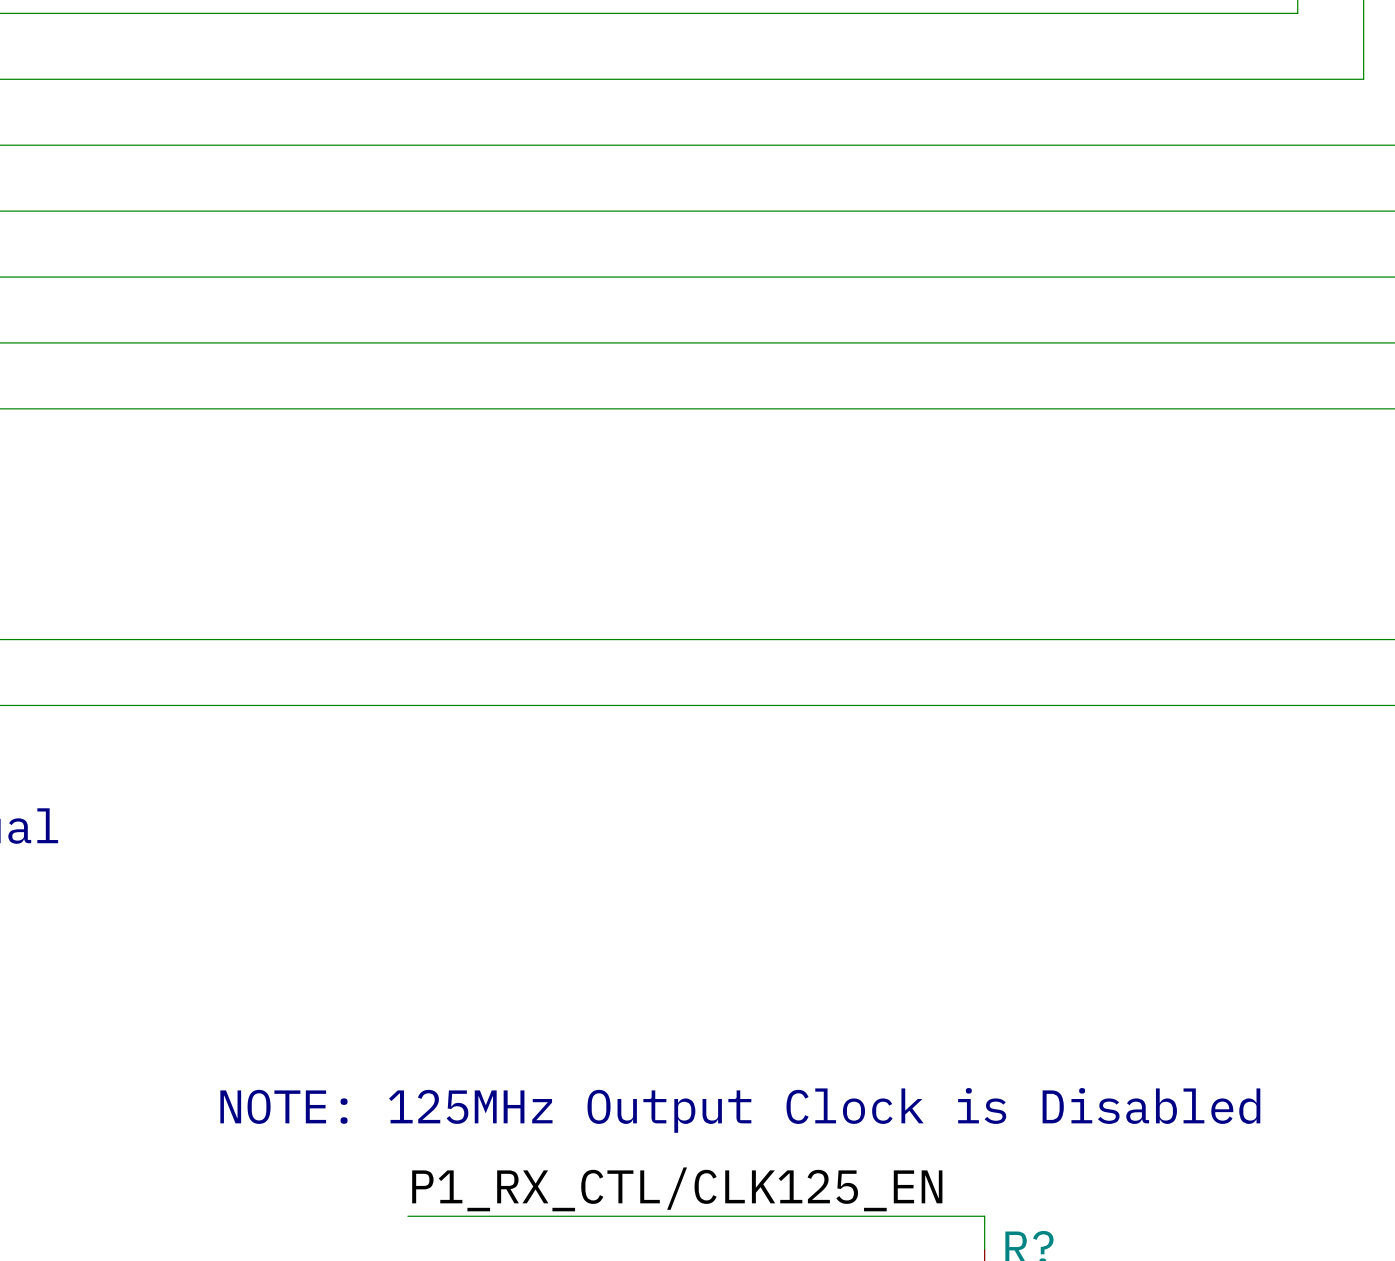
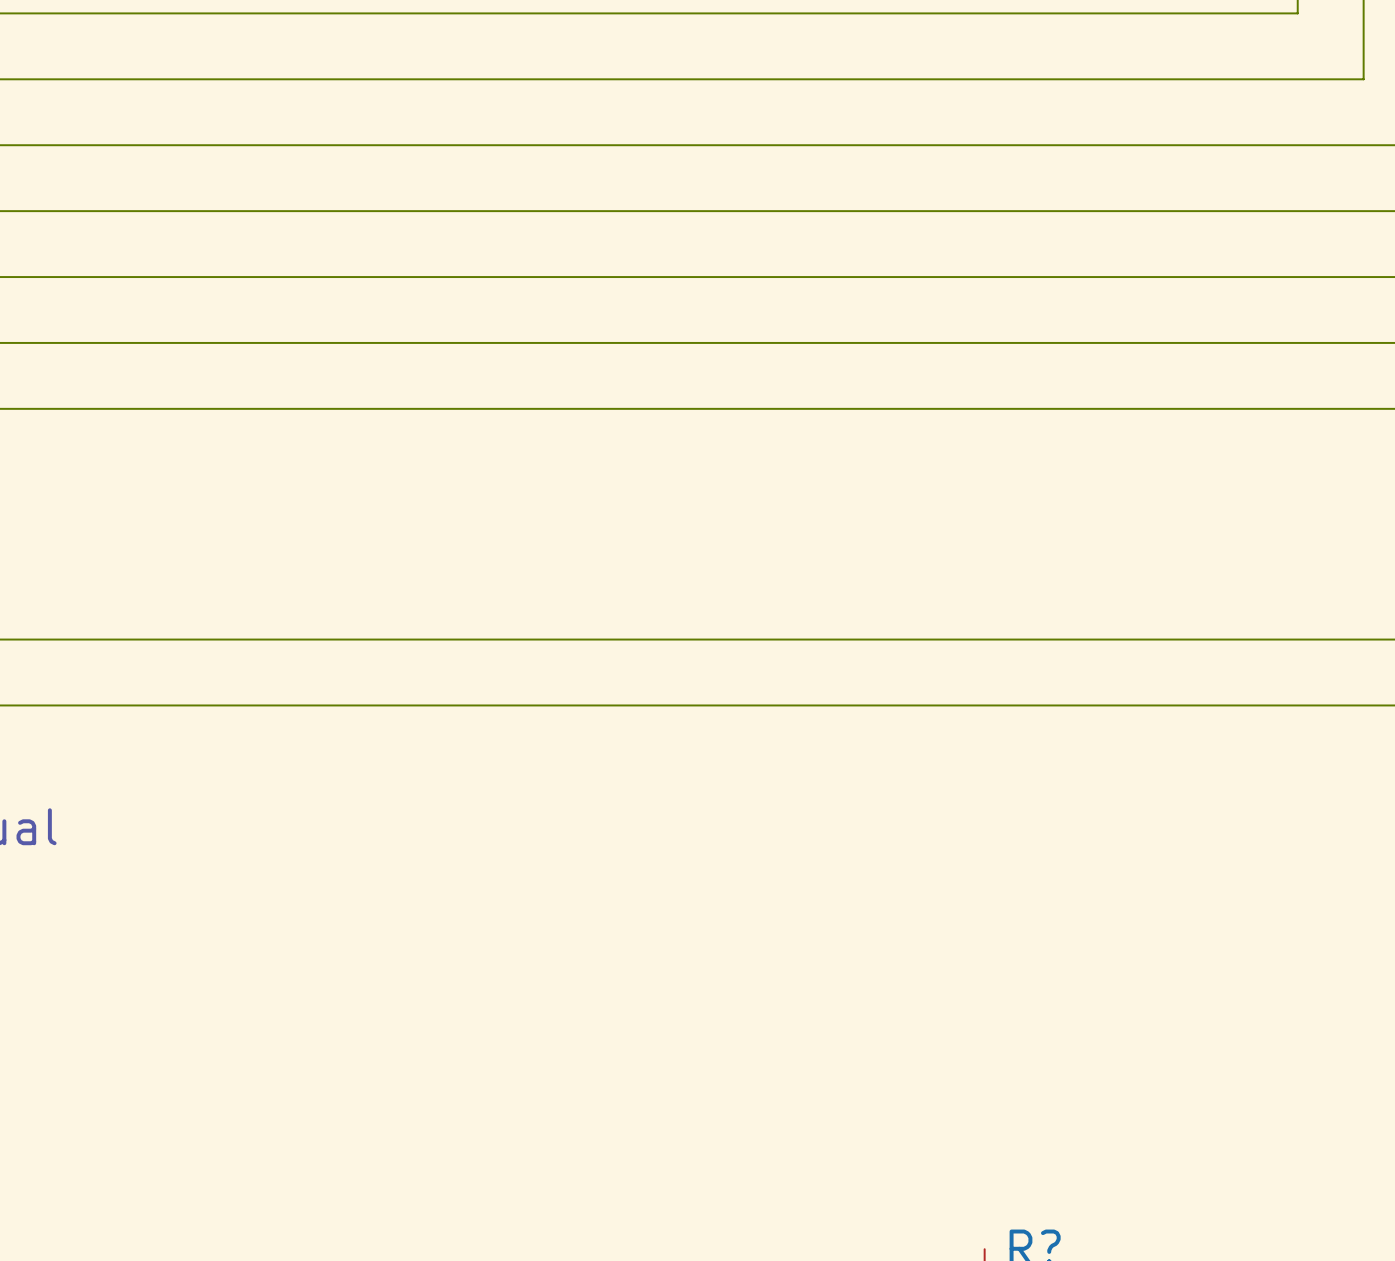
text: NOTE: 125MHz Output Clock is Disabled (740, 1110) -> none
label: P1_RX_CTL/CLK125_EN (677, 1189) -> none
wire: (407, 1216) (984, 1216) (984, 1249) -> none

